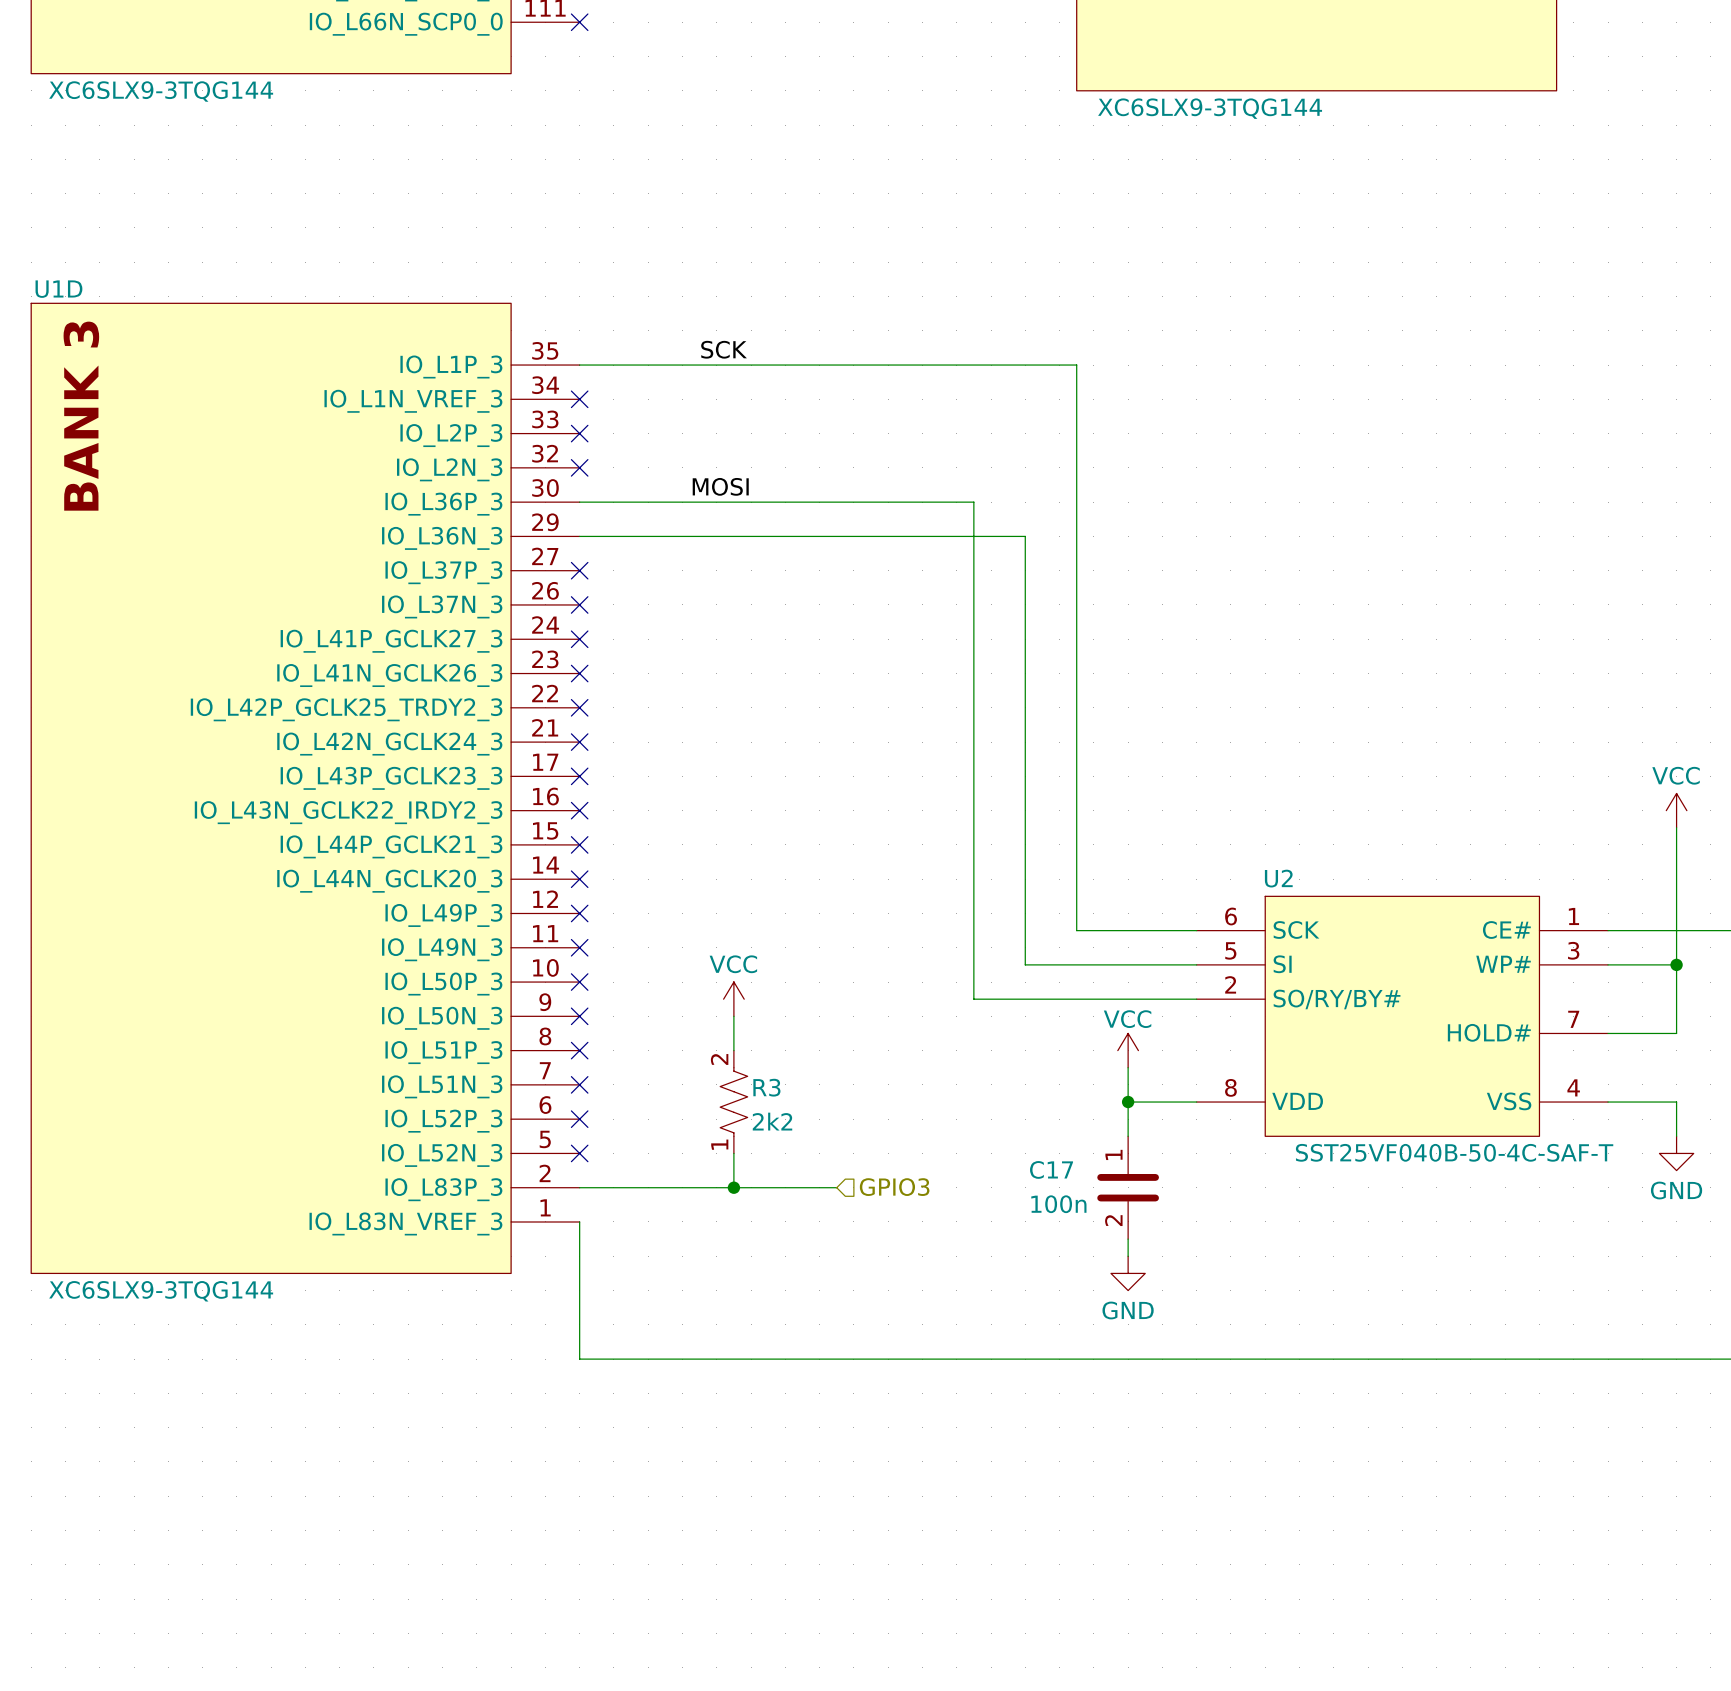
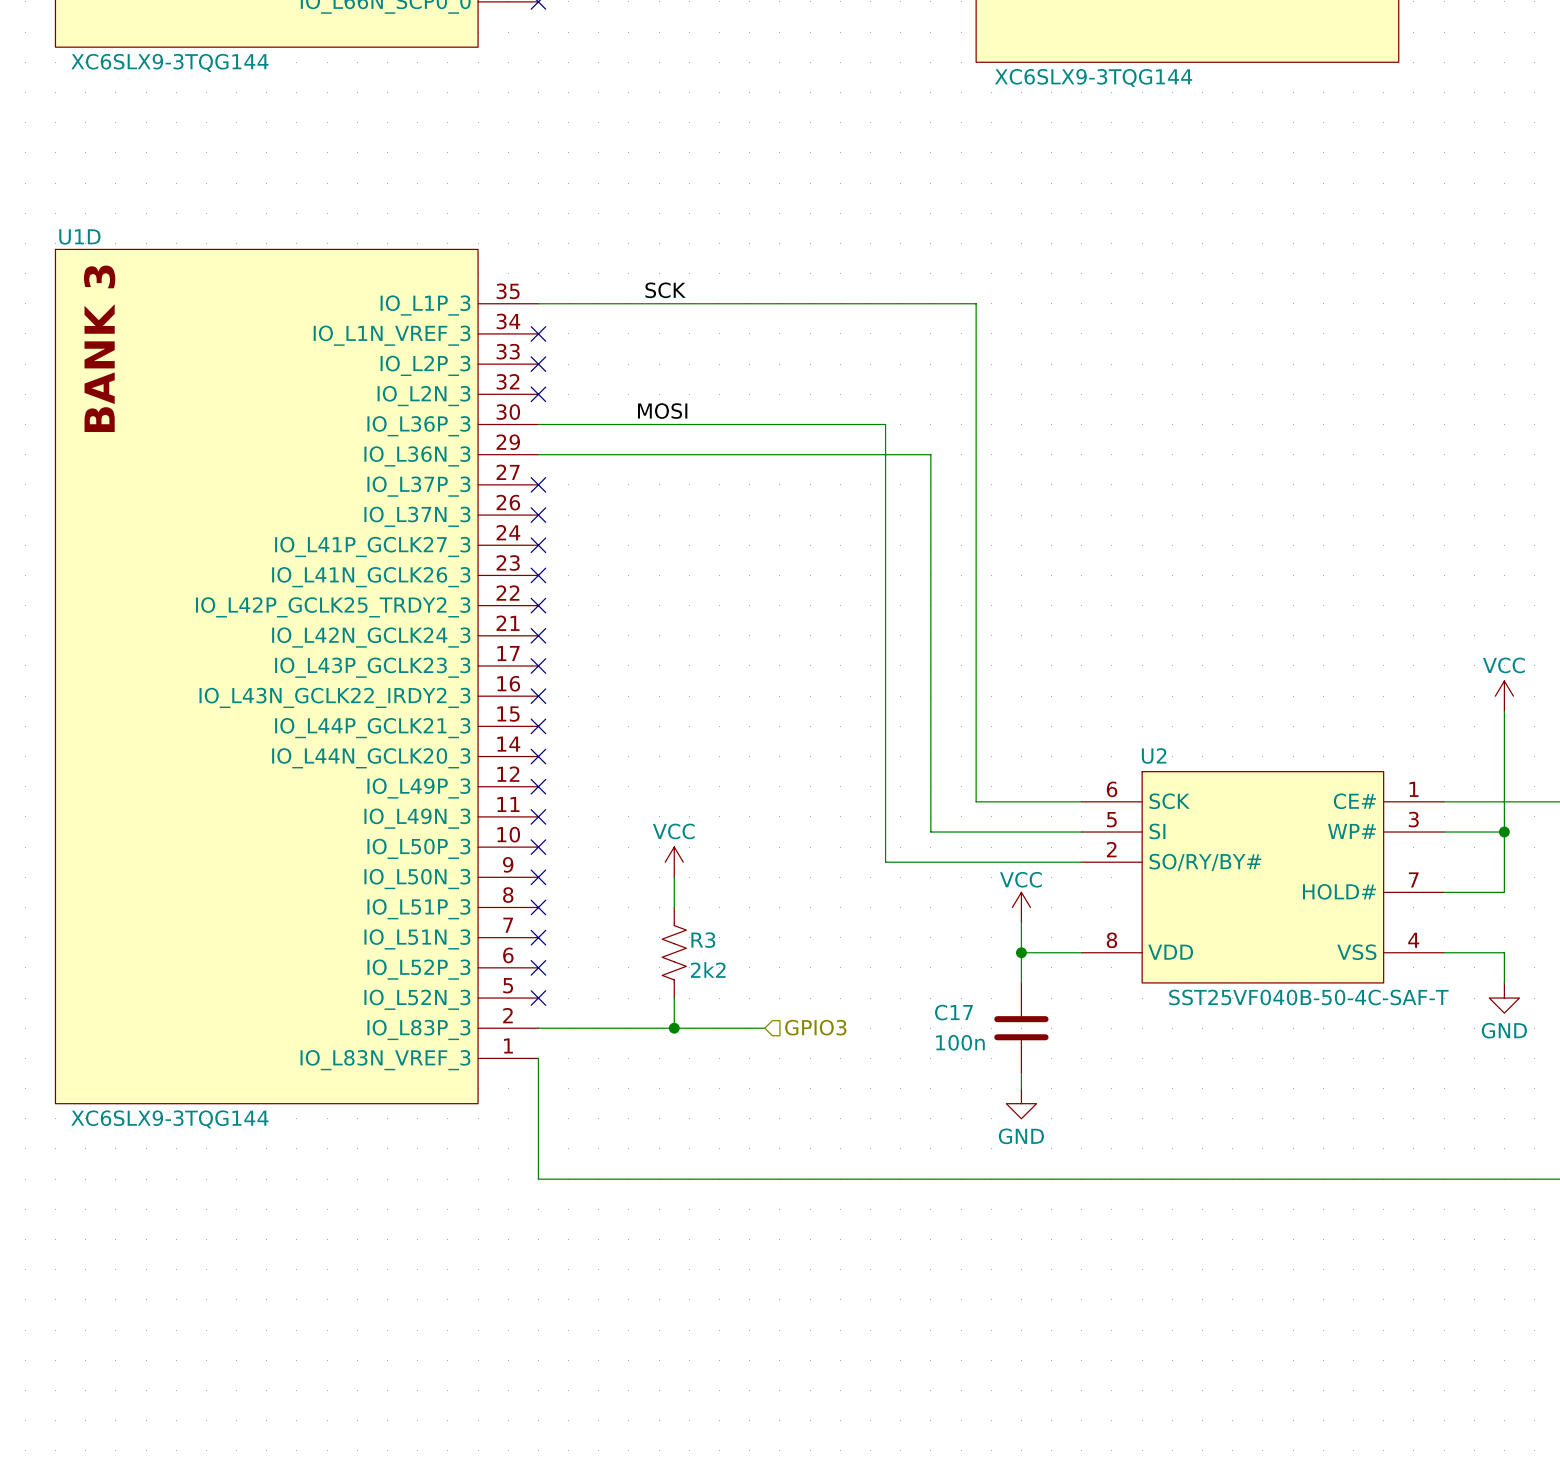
R3 pin number: 2 (719, 1059) -> none
R3 pin number: 1 (719, 1144) -> none
C17 pin number: 1 (1113, 1154) -> none
C17 pin number: 2 (1113, 1220) -> none

